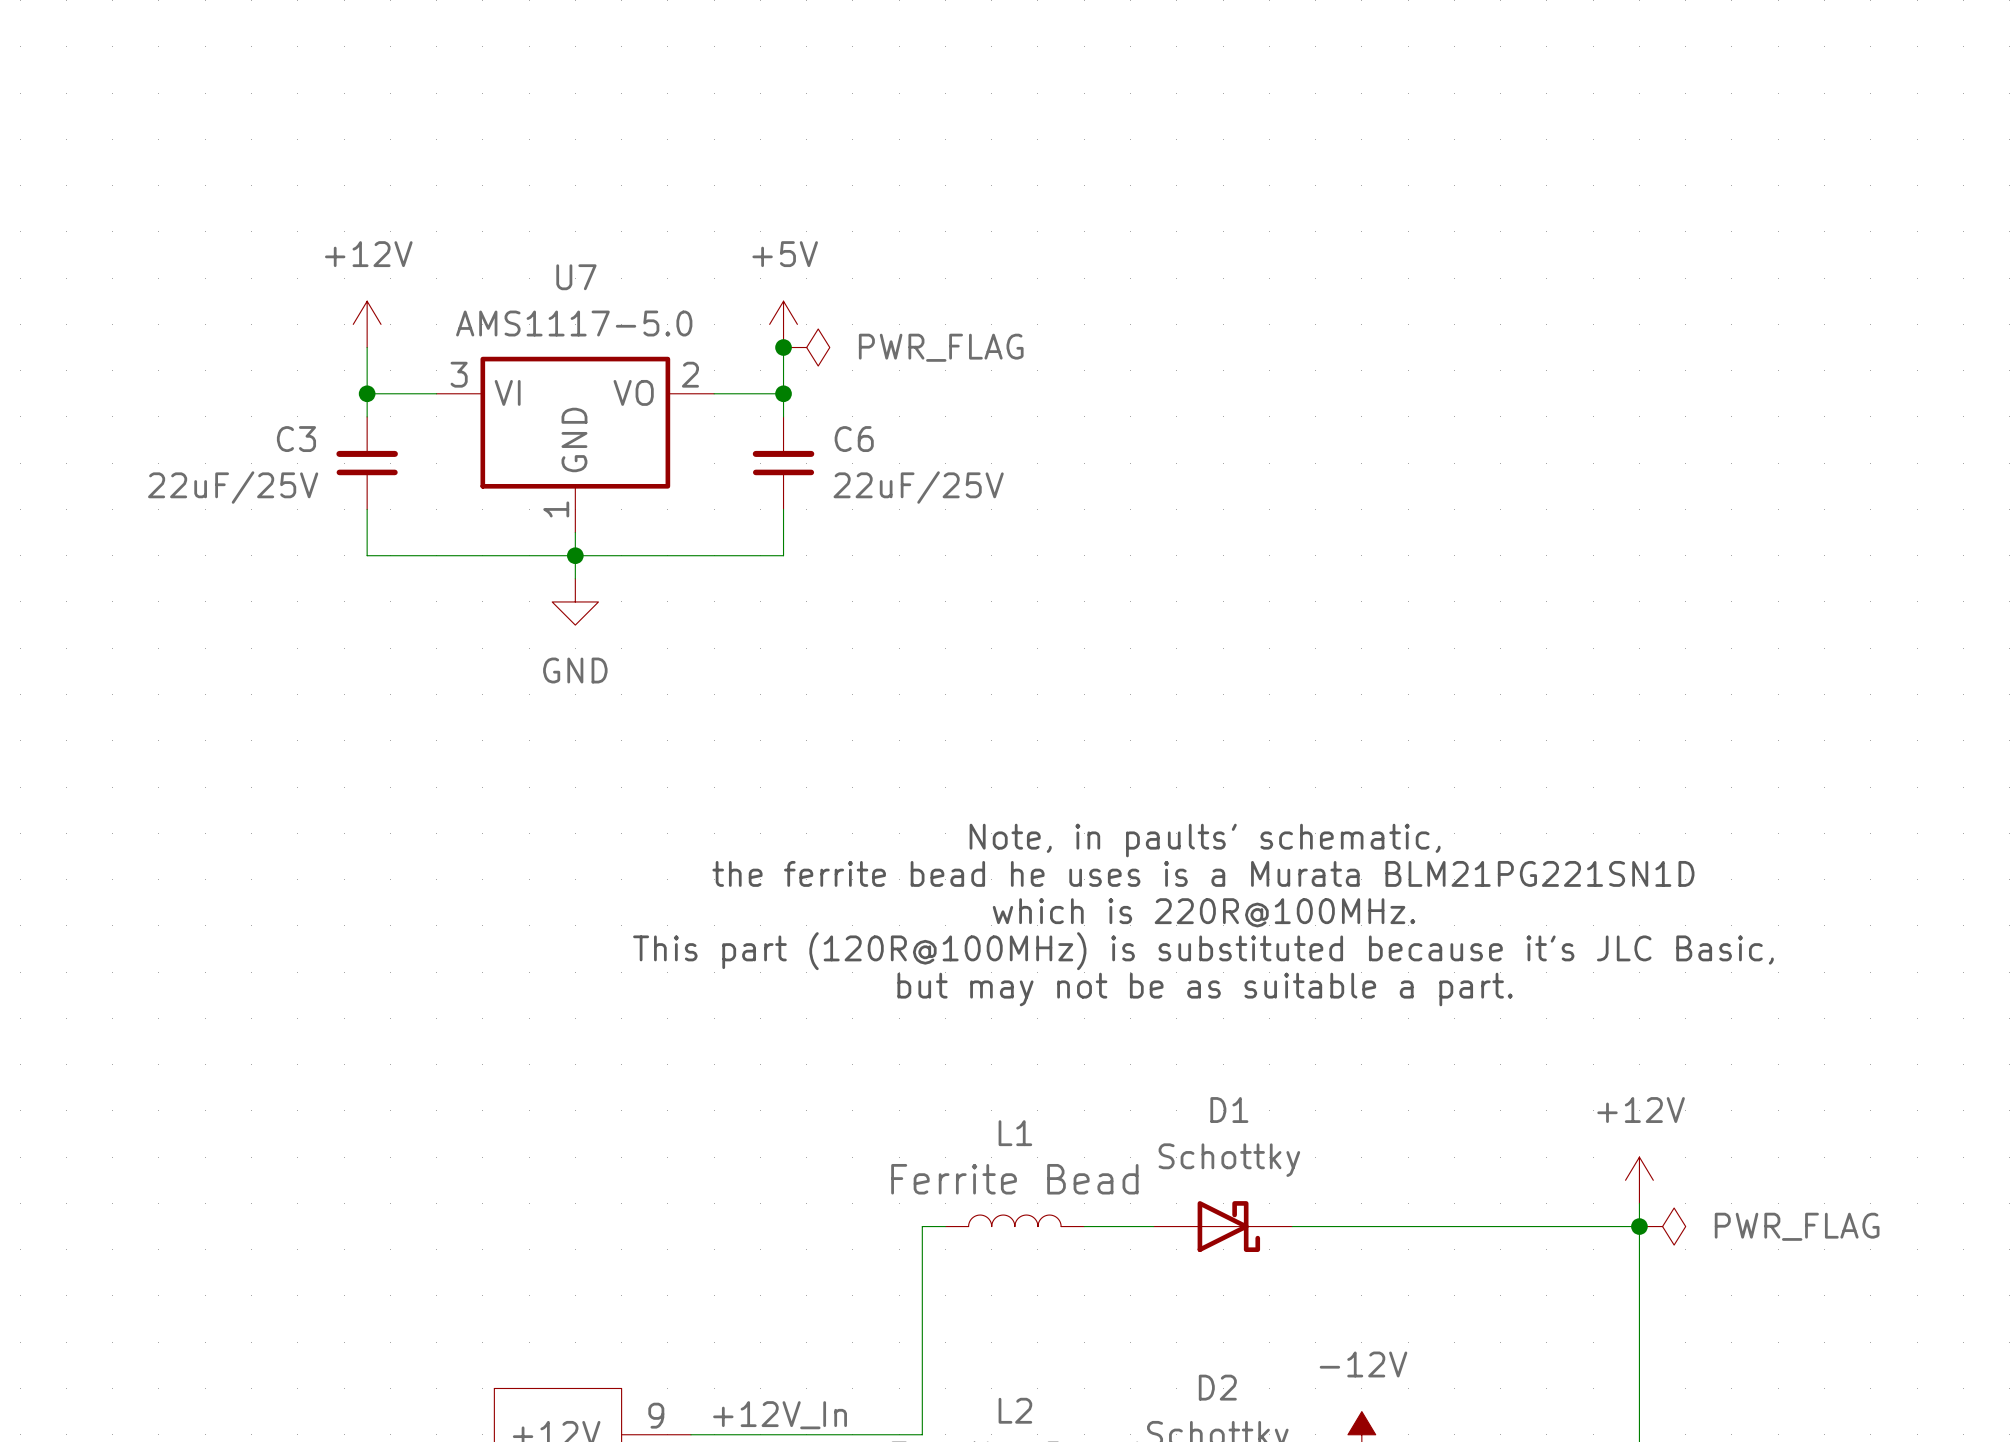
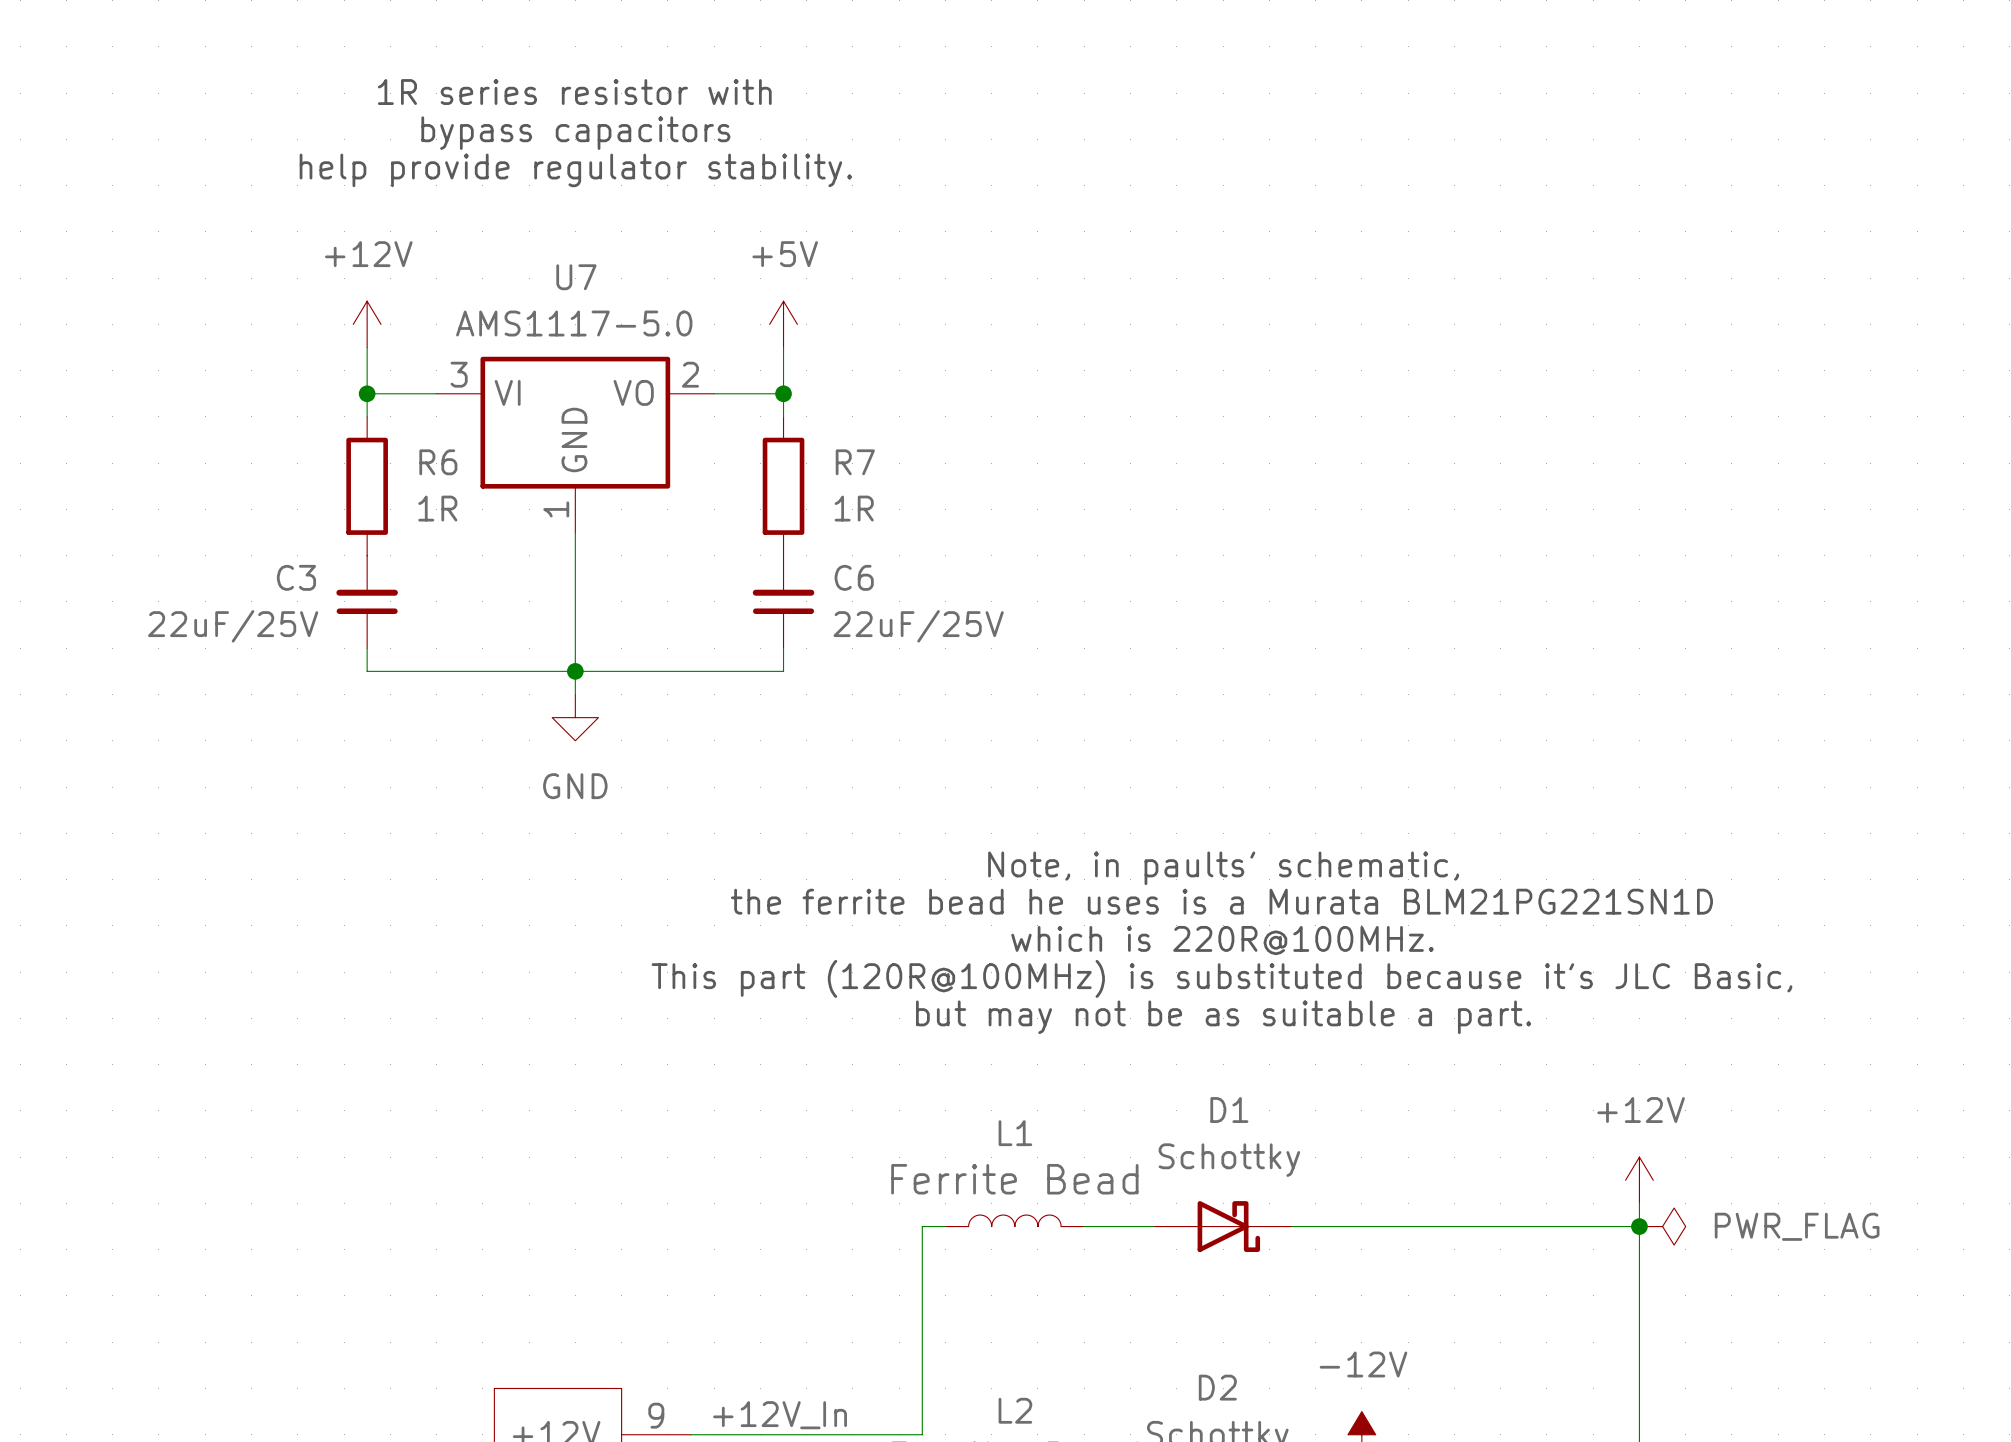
text: none -> 1R series resistor with (574, 92)
text: none -> bypass capacitors (575, 133)
text: none -> help provide regulator stability. (575, 170)
junction: (783, 347) -> none
power symbol: PWR_FLAG (806, 347) -> none
C3 position: (367, 463) -> (367, 601)
C6 position: (783, 463) -> (783, 601)
R6: none -> (367, 486)
R7: none -> (783, 486)
wire: (367, 509) (367, 555) (783, 555) (783, 509) -> none
junction: (575, 555) -> none
wire: none -> (575, 578) (575, 694)
power symbol position: GND (575, 601) -> GND (575, 717)
wire: none -> (367, 648) (367, 671) (783, 671) (783, 648)
junction: none -> (575, 671)
text position: Note, in paults' schematic, (1205, 840) -> Note, in paults' schematic, (1223, 868)
text position: the ferrite bead he uses is a Murata BLM21PG221SN1D (1203, 873) -> the ferrite bead he uses is a Murata BLM21PG221SN1D (1221, 901)
text position: which is 220R@100MHz. (1203, 912) -> which is 220R@100MHz. (1222, 940)
text position: This part (120R@100MHz) is substituted because it's JLC Basic, (1203, 951) -> This part (120R@100MHz) is substituted because it's JLC Basic, (1221, 978)
text position: but may not be as suitable a part. (1205, 989) -> but may not be as suitable a part. (1223, 1017)

